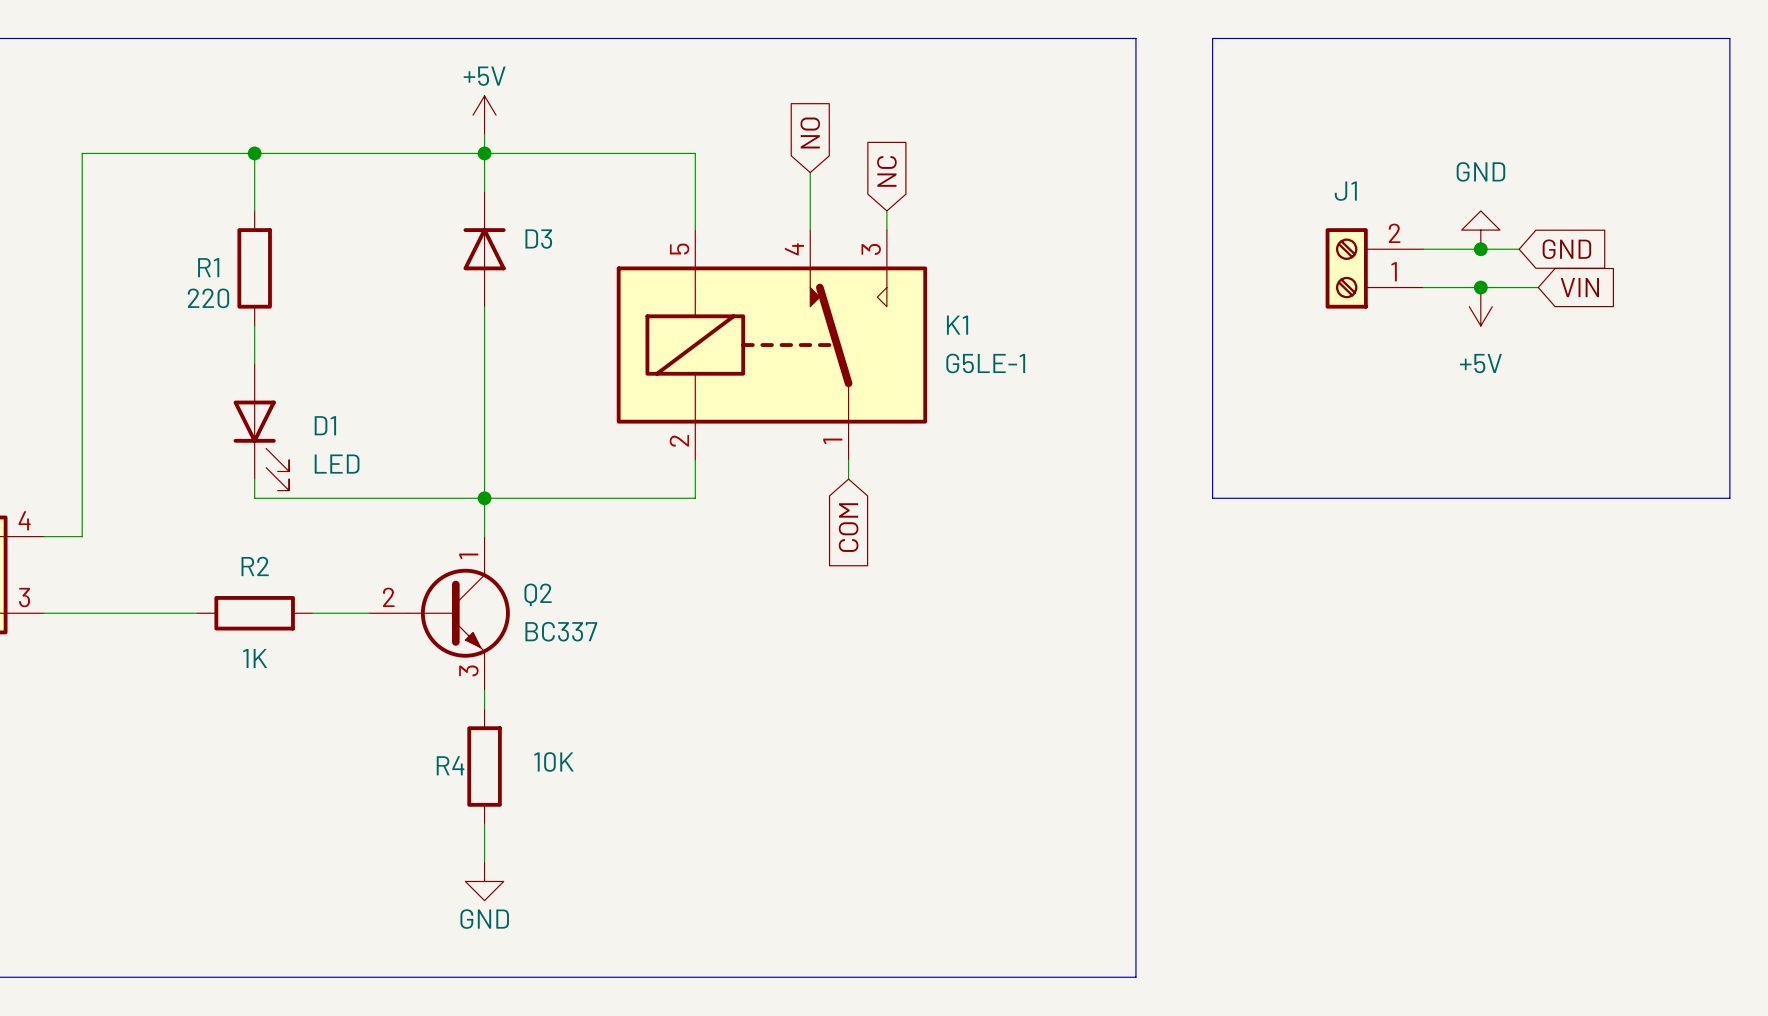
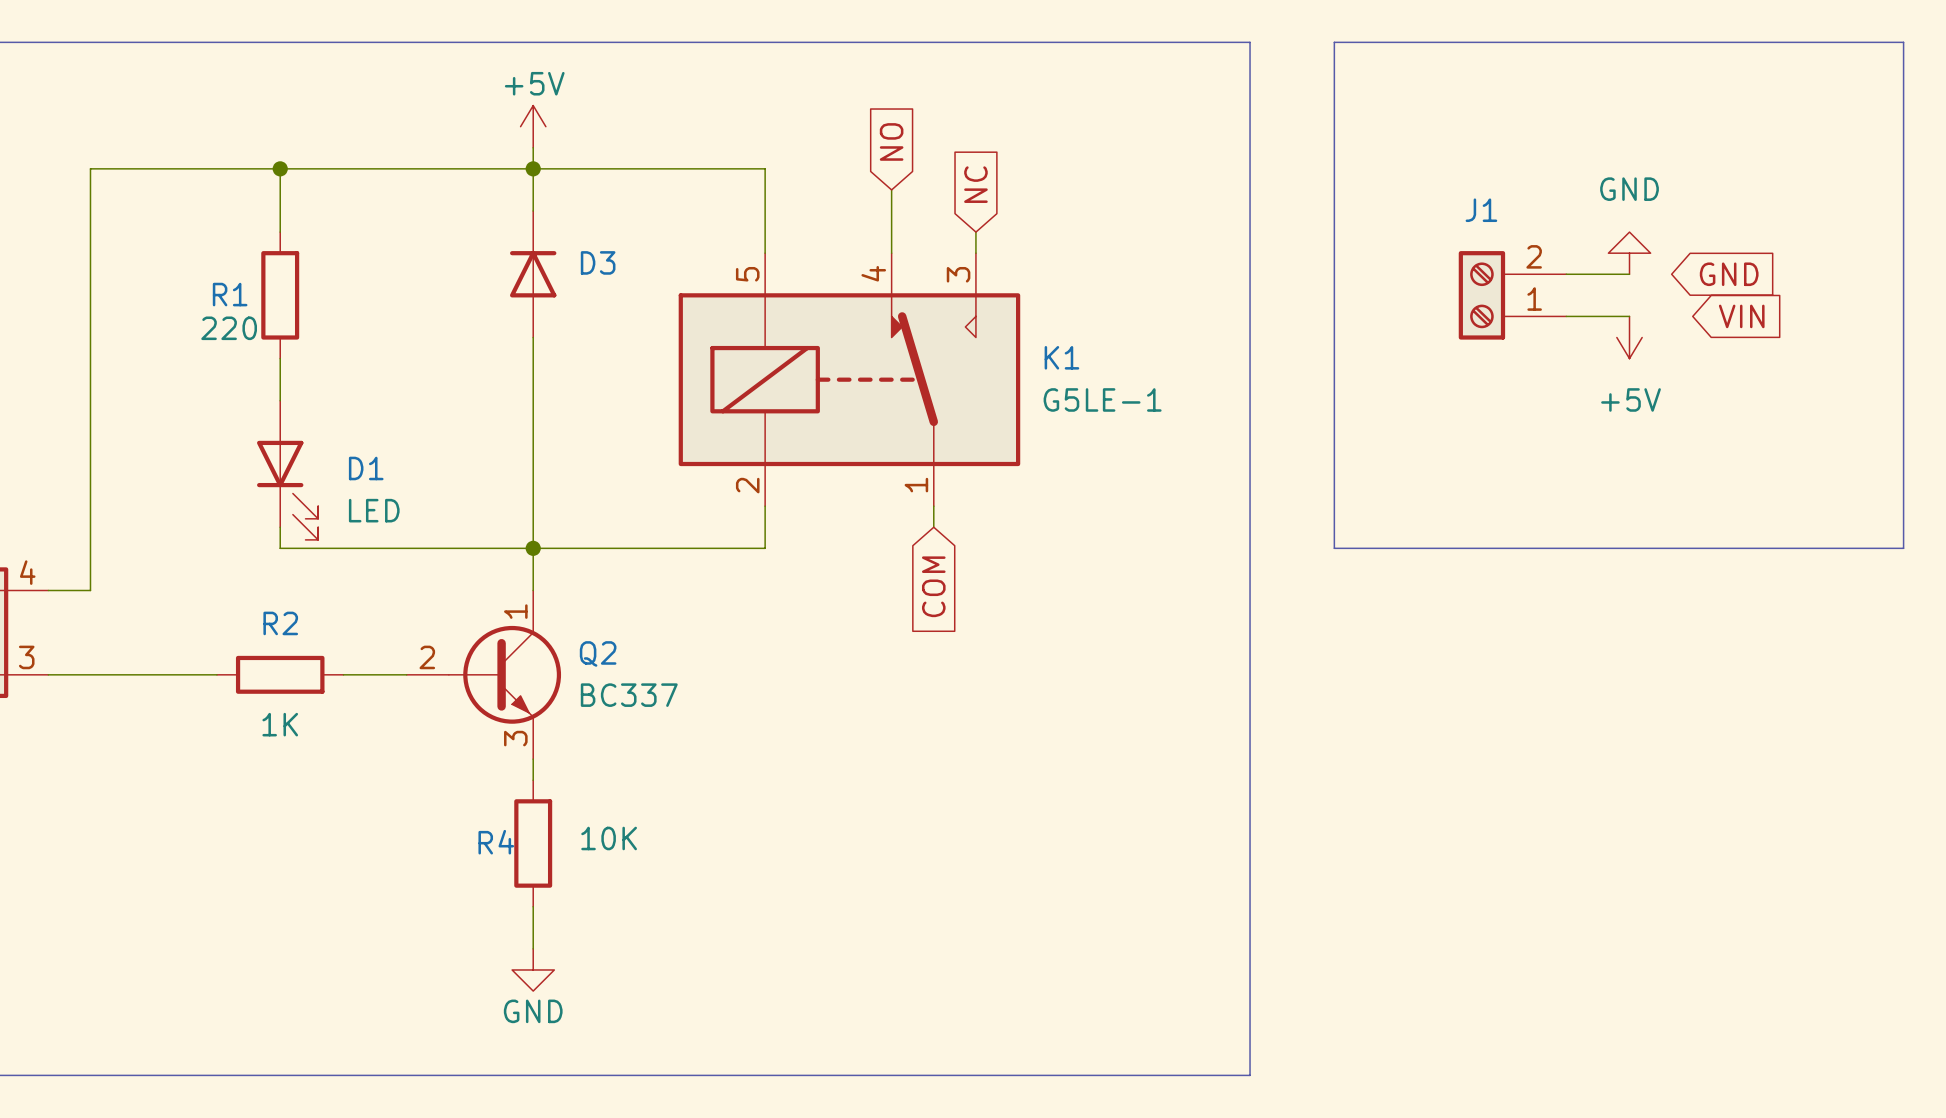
wire: (1480, 249) (1519, 249) -> none
junction: (1480, 249) -> none
wire: (1480, 287) (1538, 287) -> none
junction: (1480, 287) -> none

